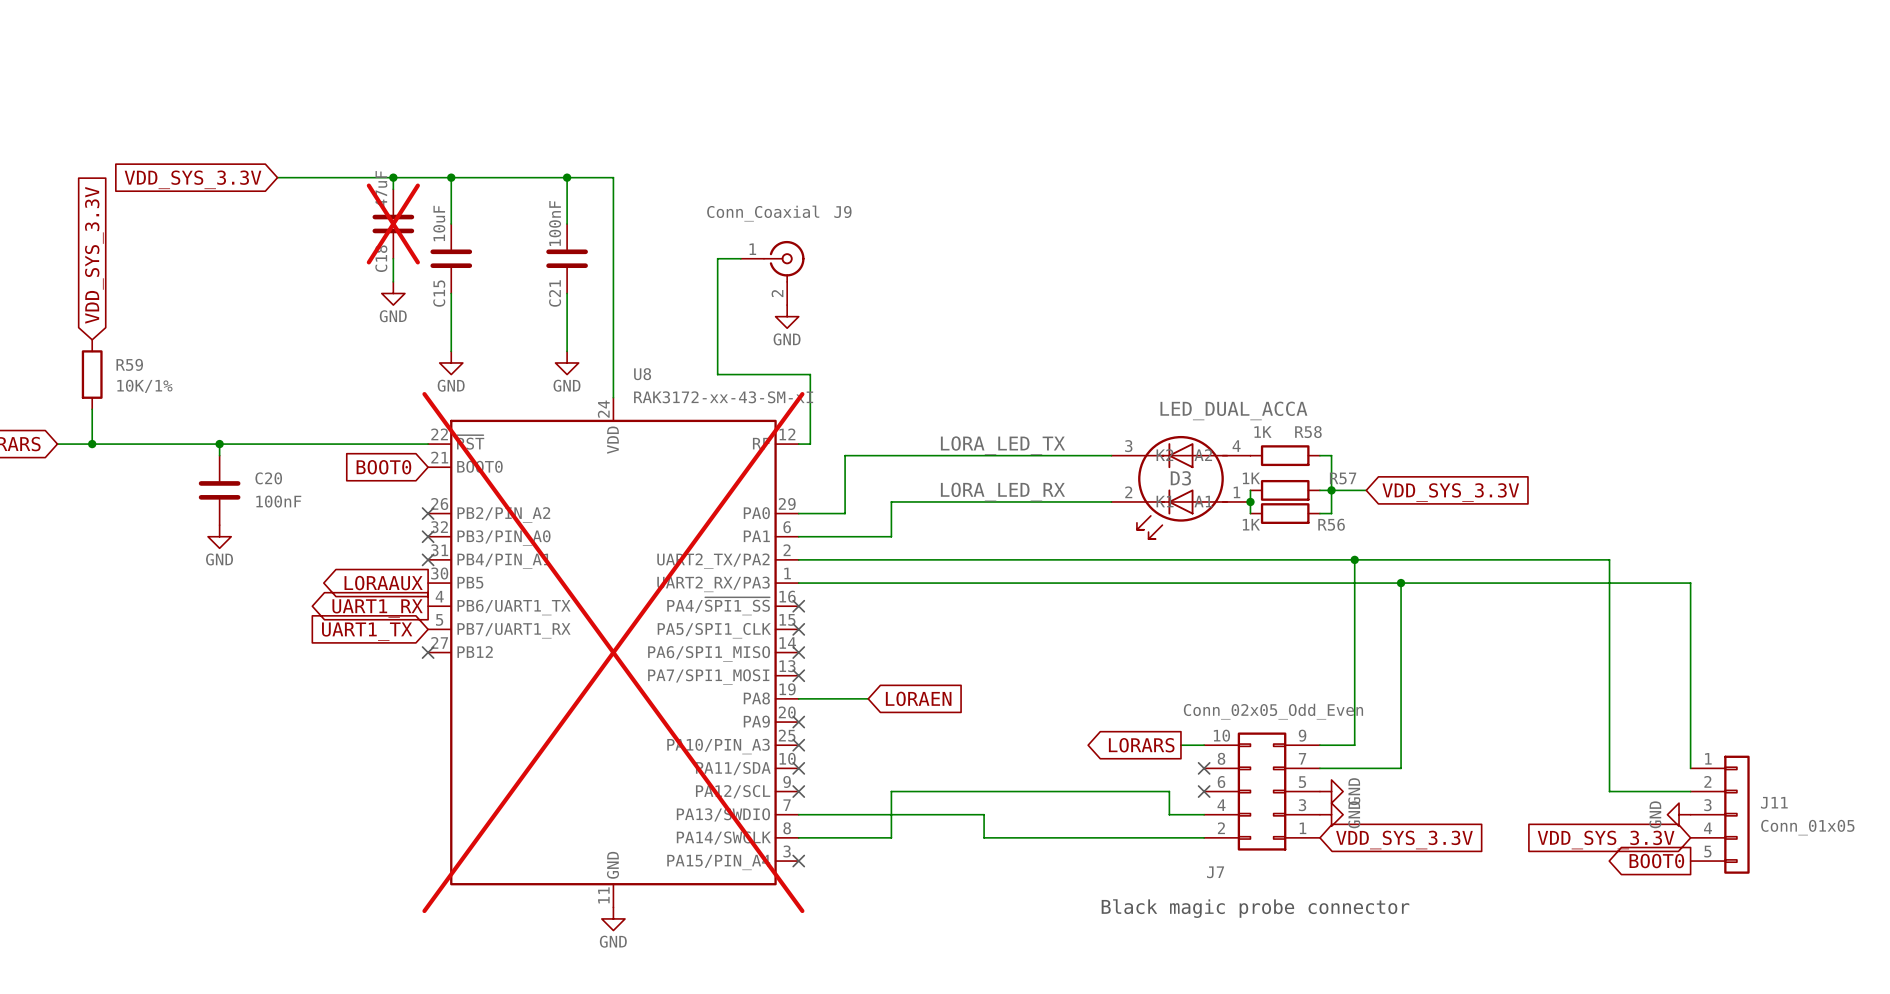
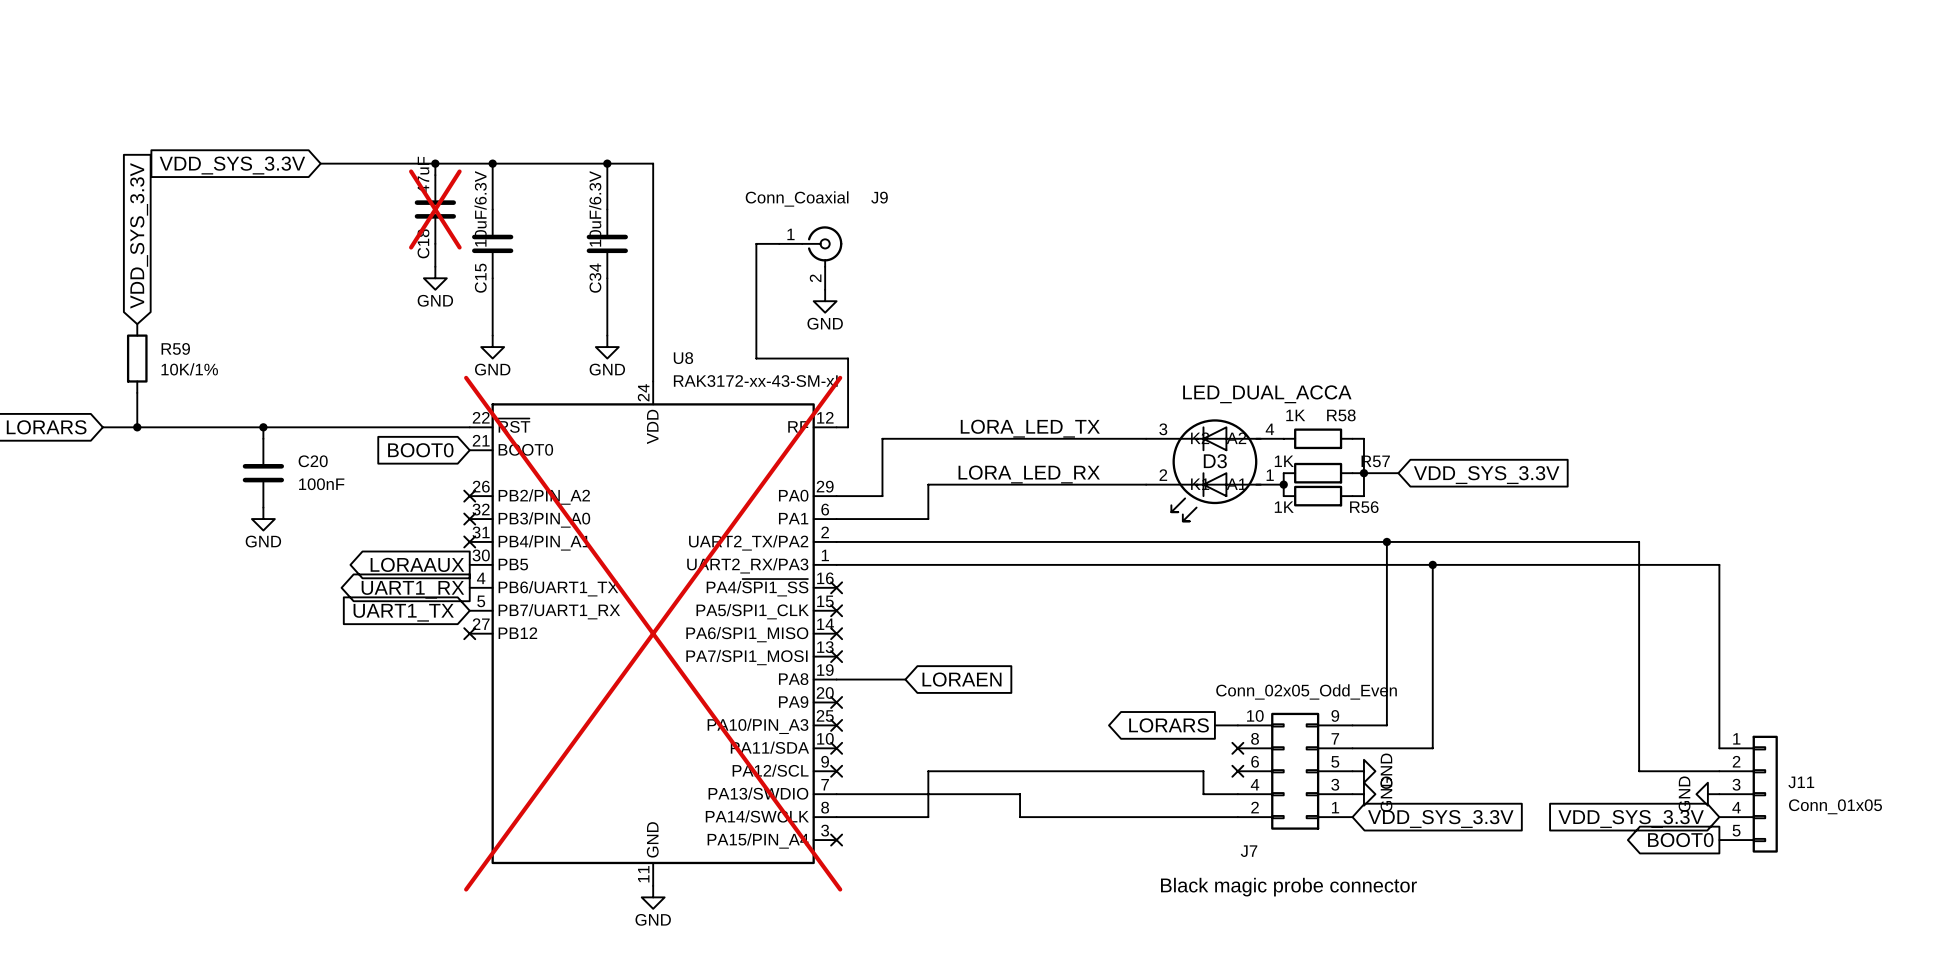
C15 value: 10uF (439, 223) -> 10uF/6.3V (480, 208)
C21 value: 100nF (555, 223) -> 10uF/6.3V (595, 208)
C21 name: C21 (555, 293) -> C34 (595, 278)

